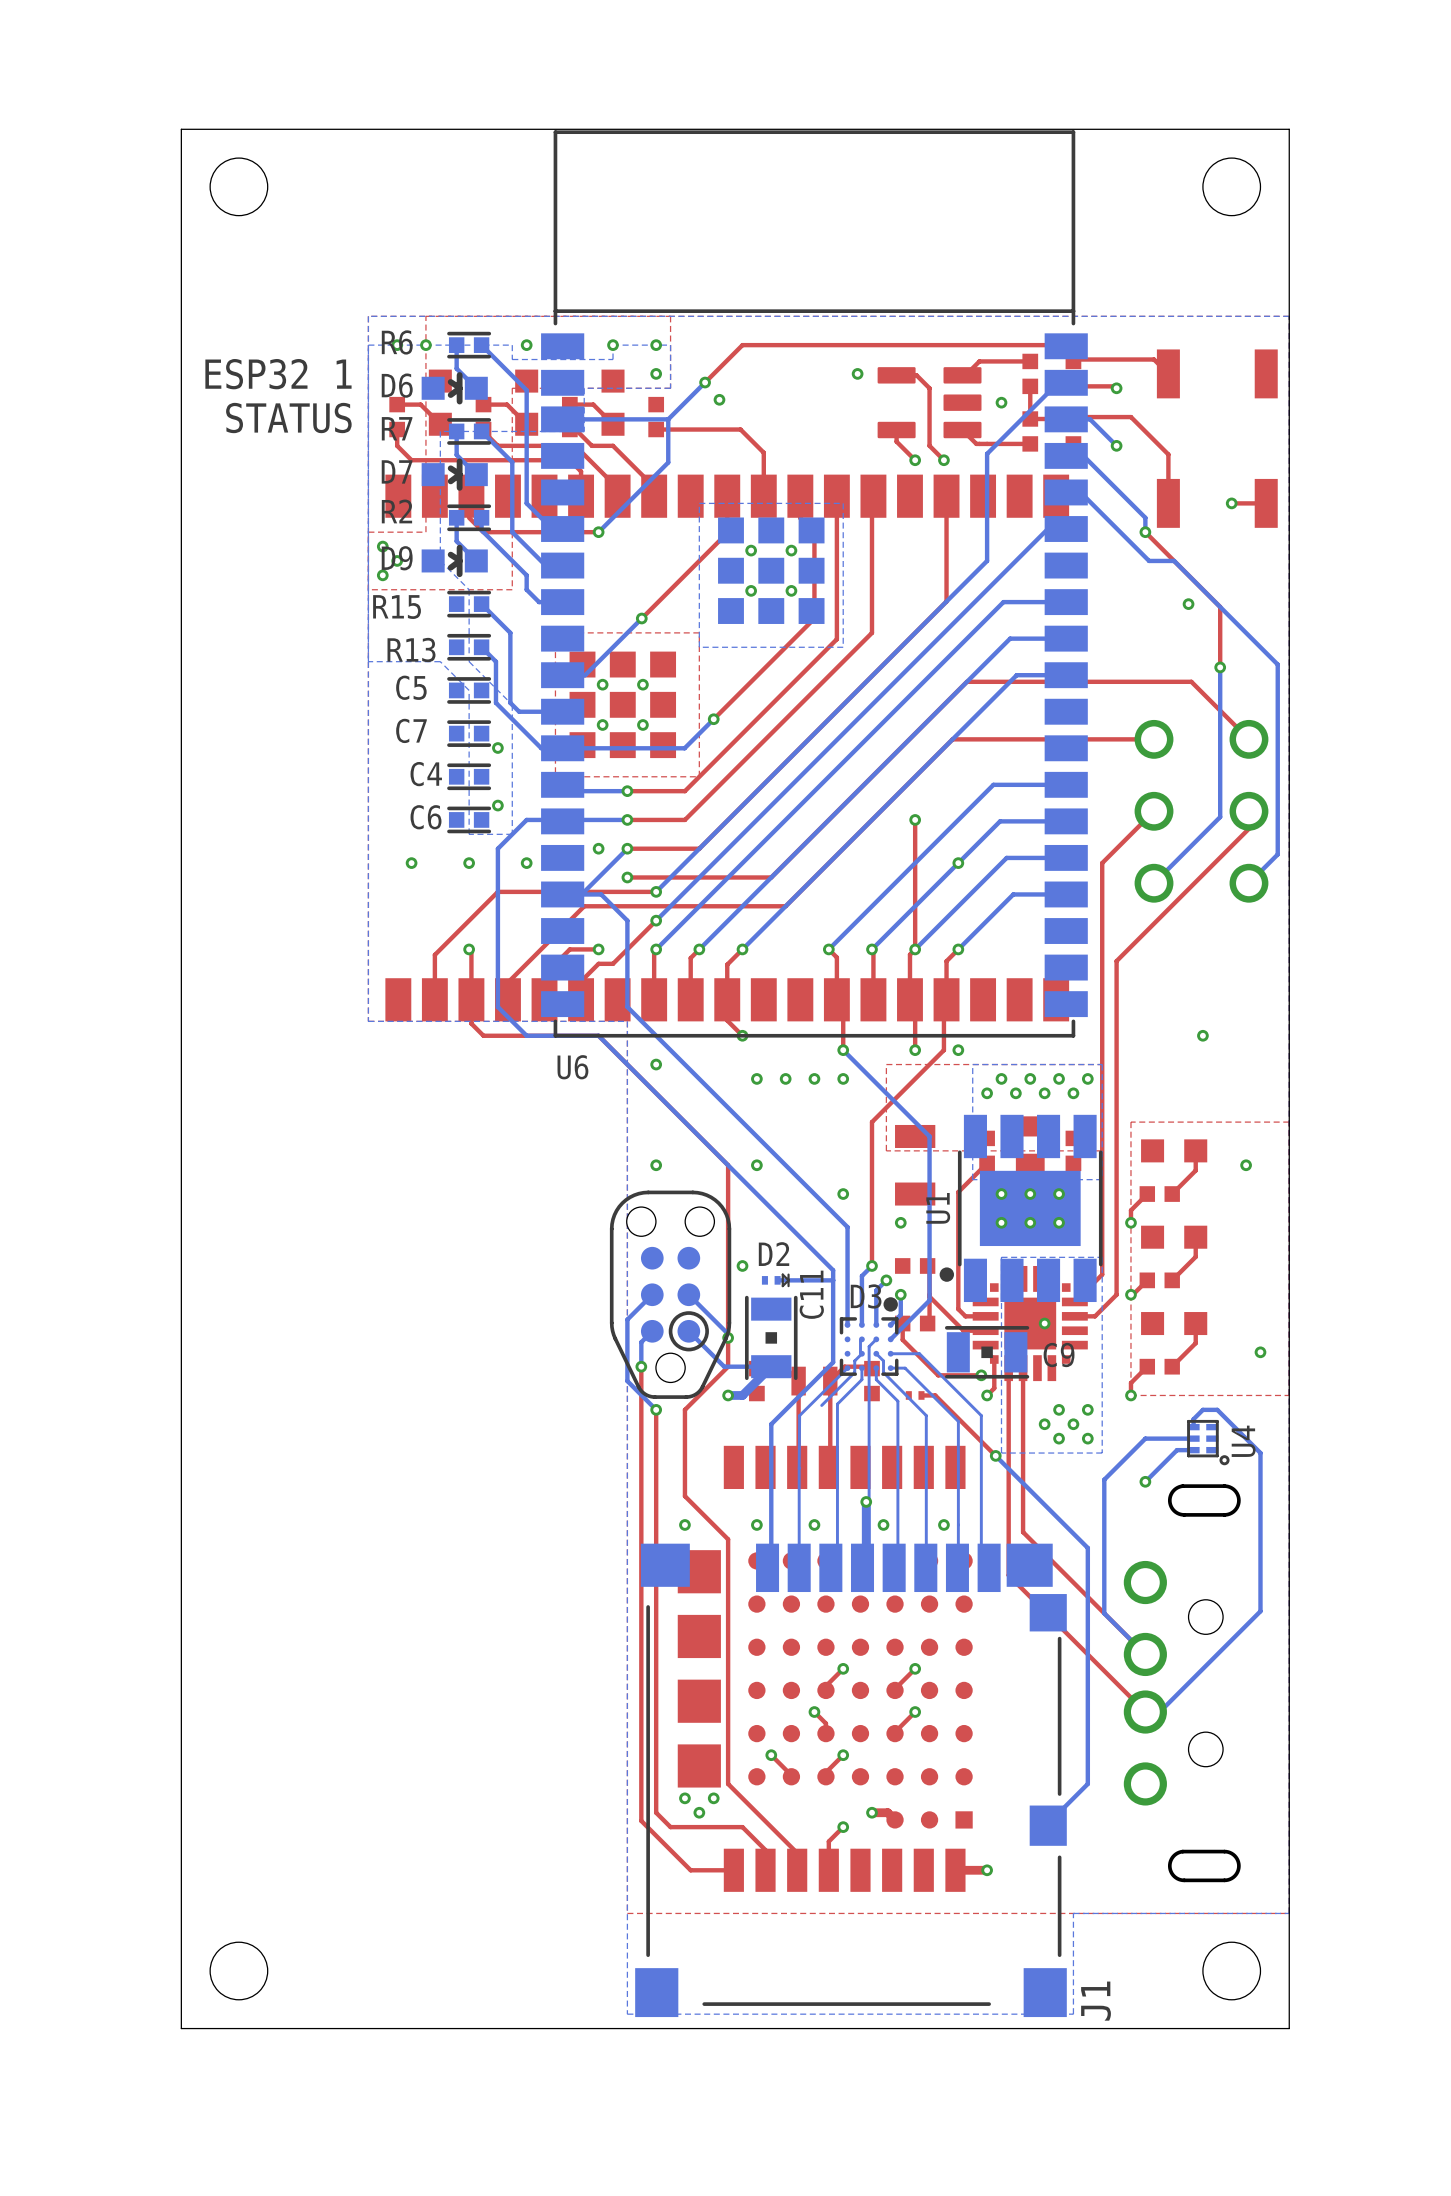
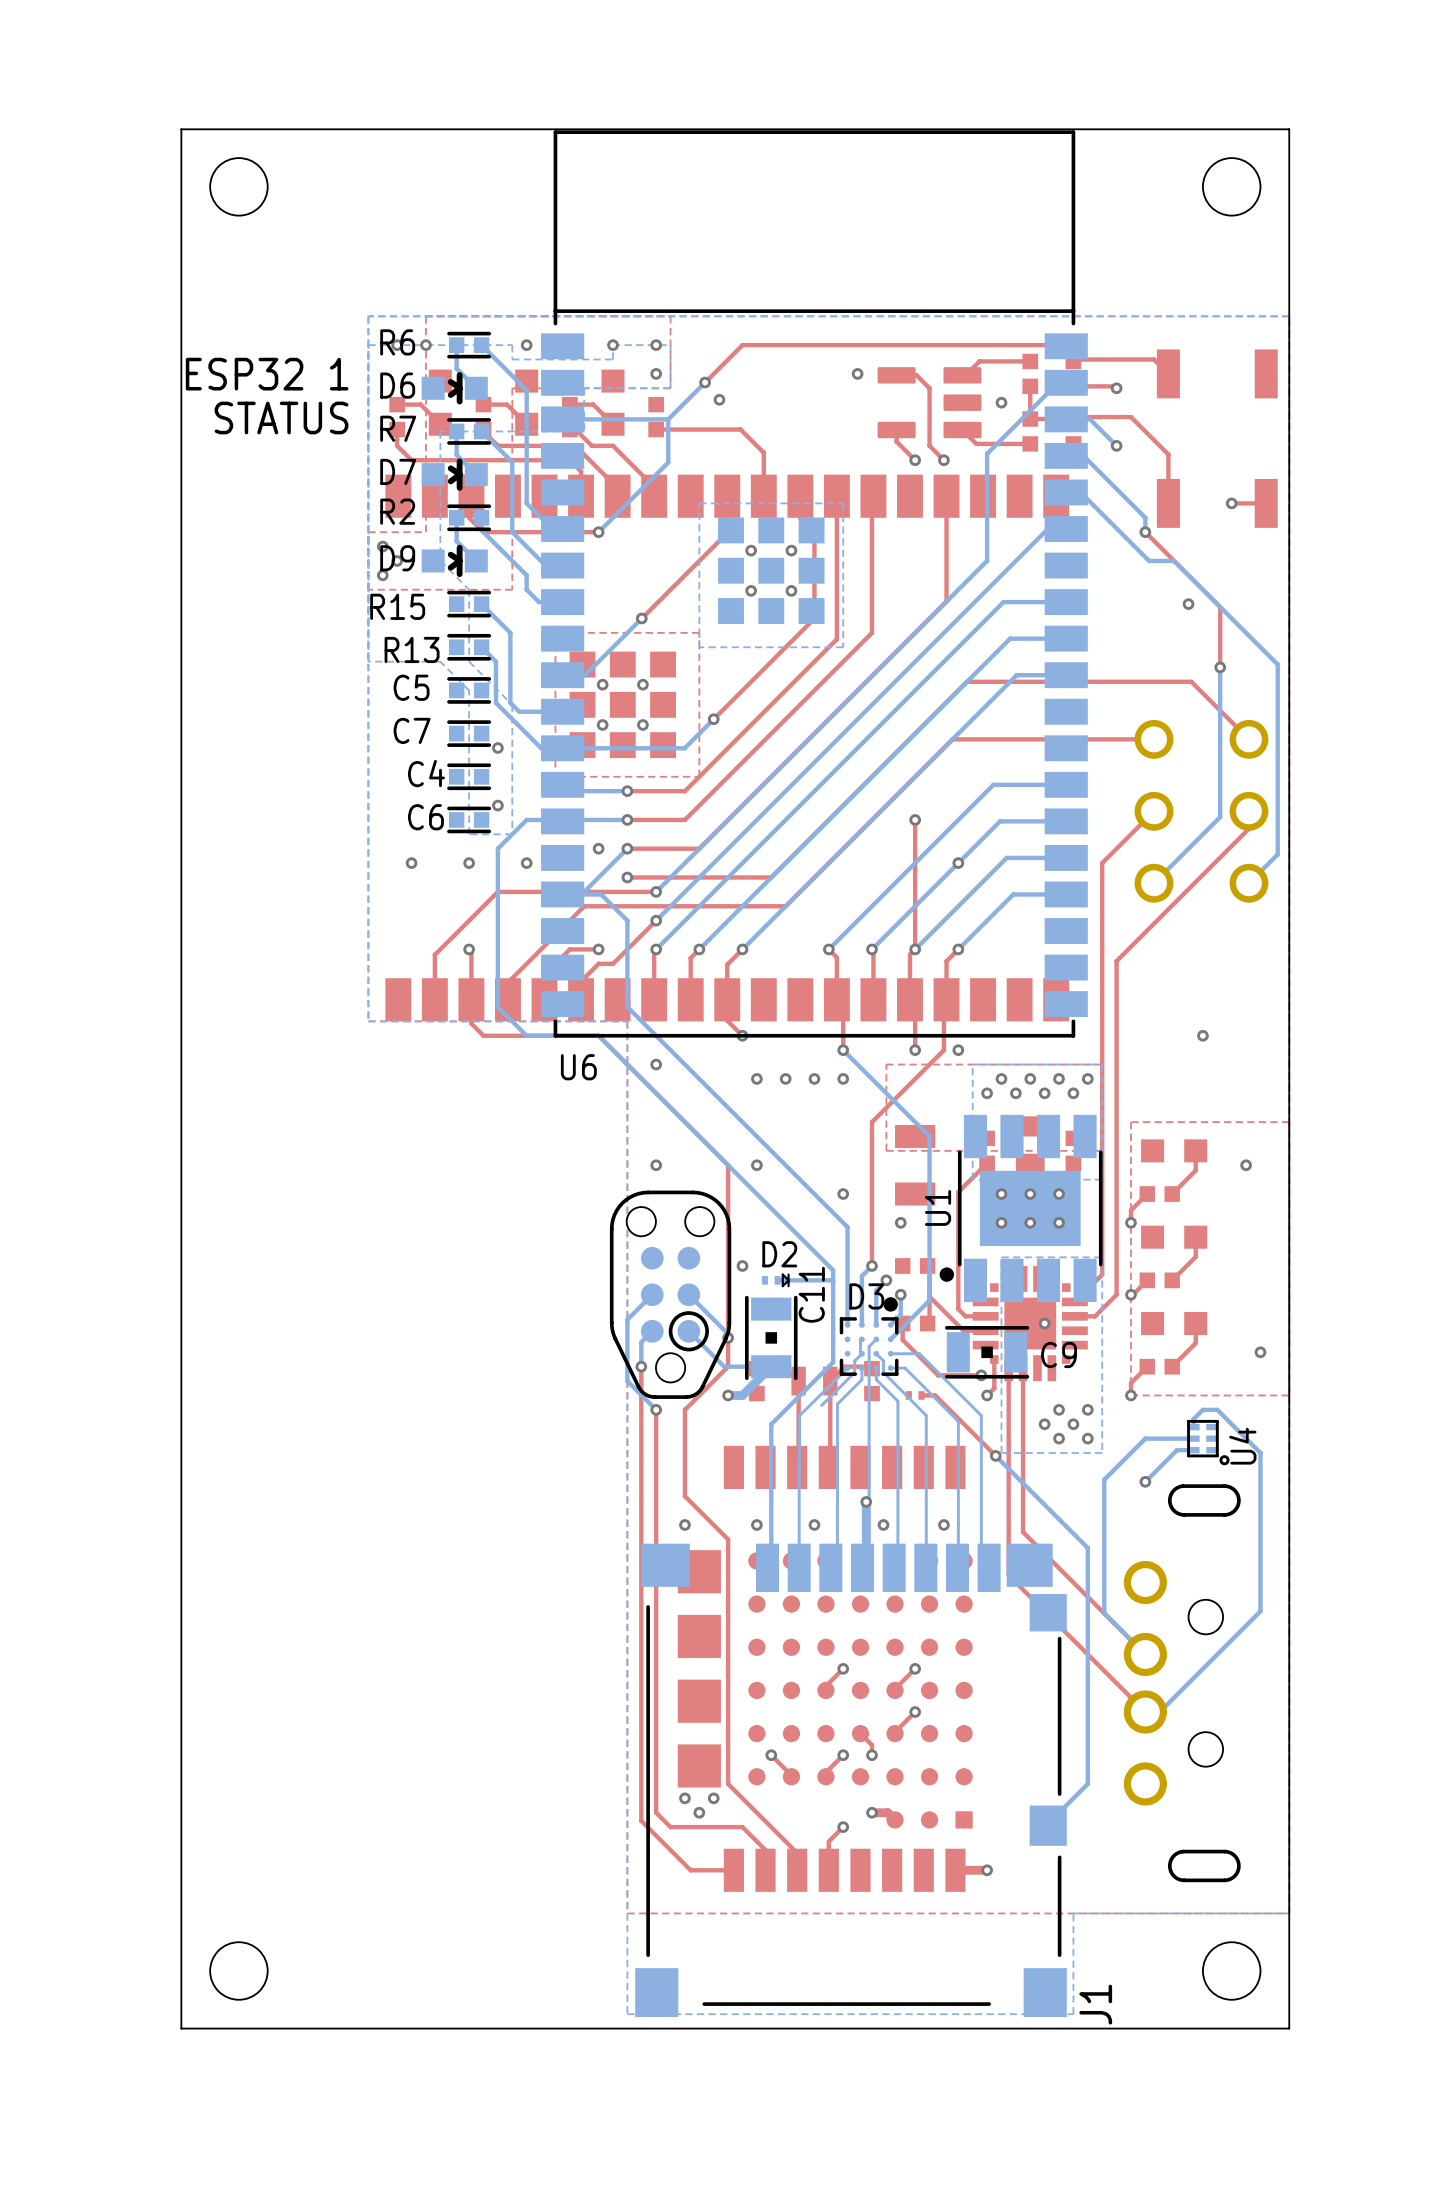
top track: (814, 1712) (825, 1723) (825, 1733) -> (860, 1733) (872, 1745) (872, 1755)
via position: (814, 1712) -> (872, 1755)

